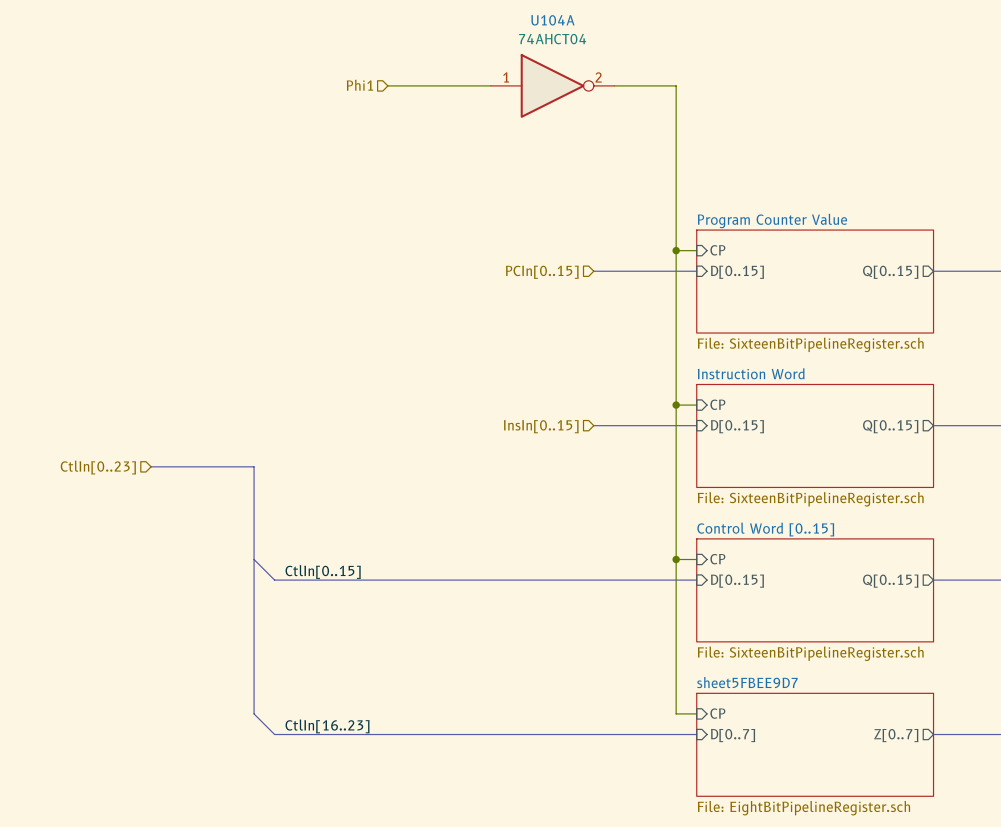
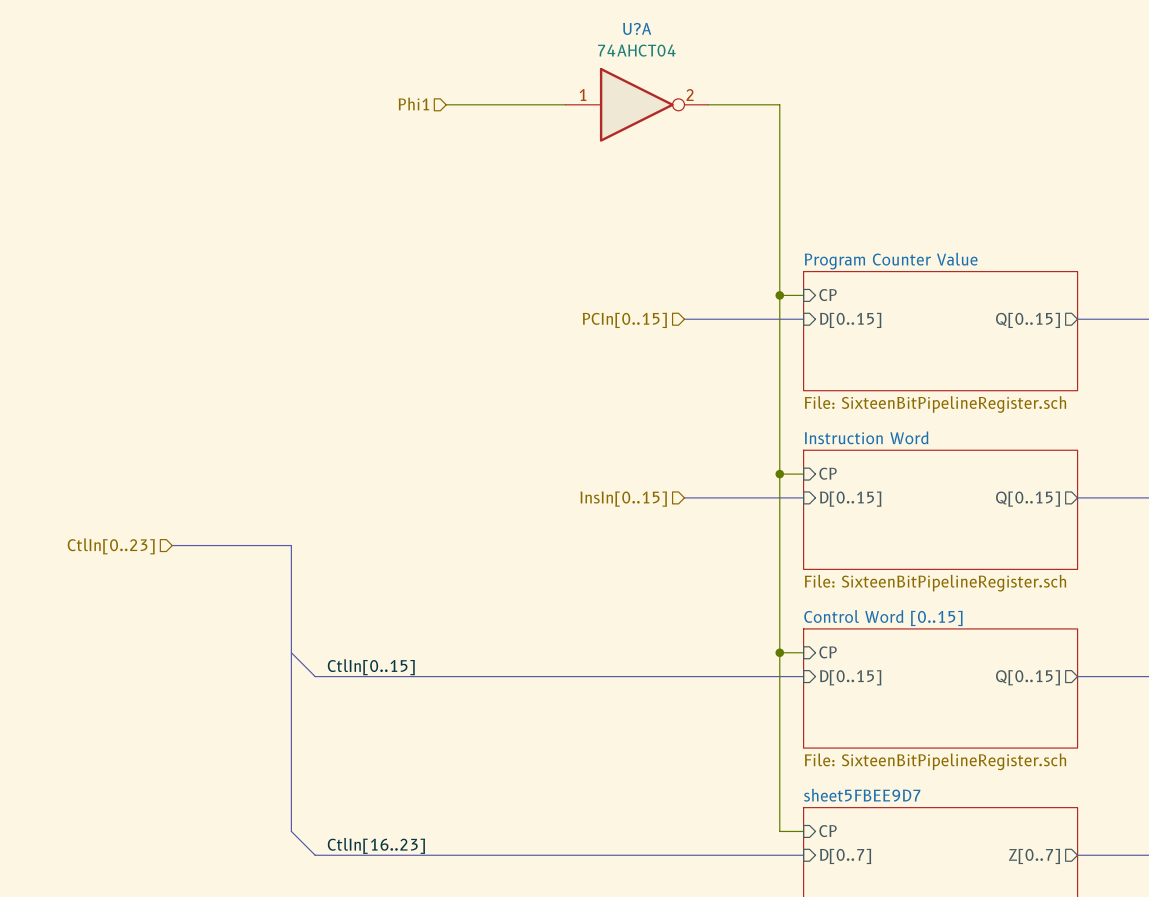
U104A name: U104A (552, 20) -> U?A (637, 28)

